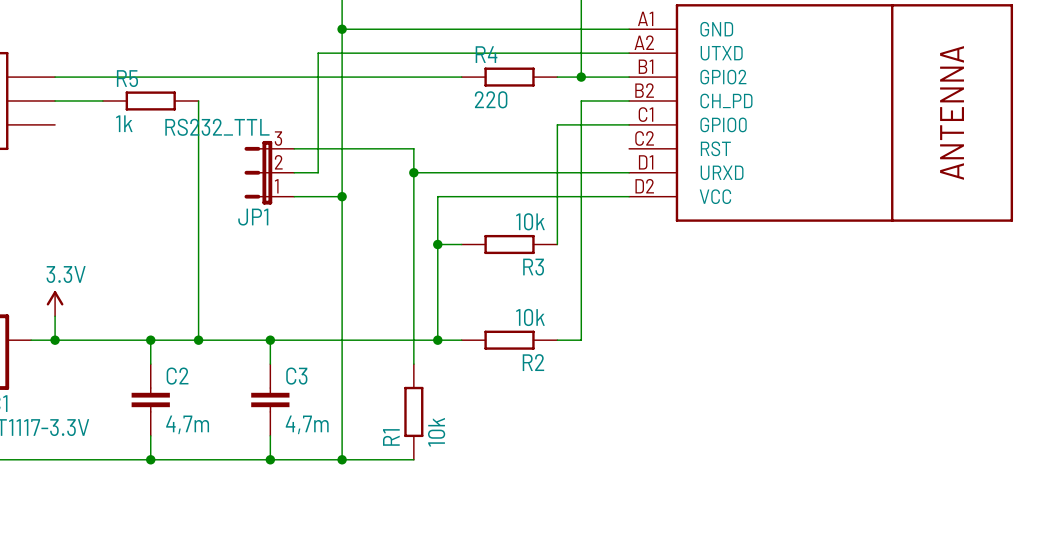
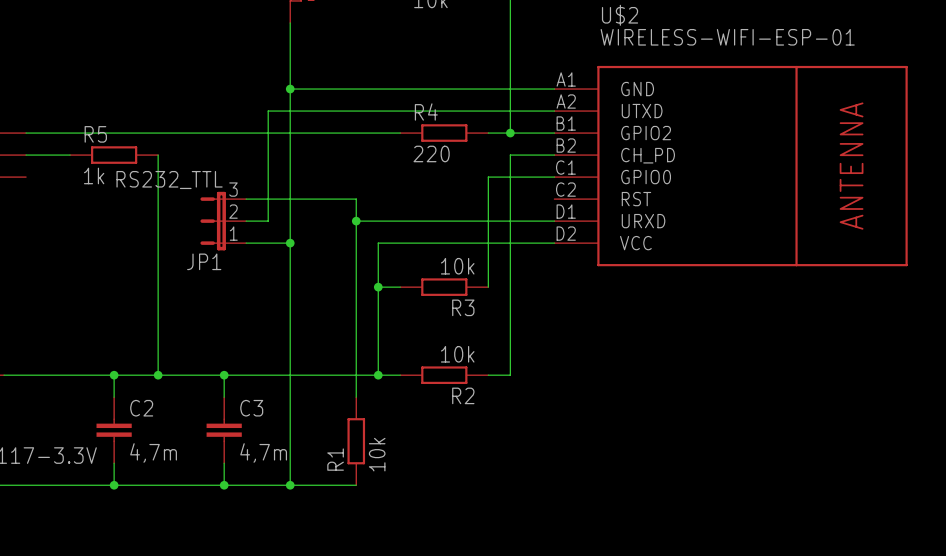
power symbol: 3.3V (55, 303) -> none
wire: (55, 316) (55, 340) -> none
junction: (55, 340) -> none

